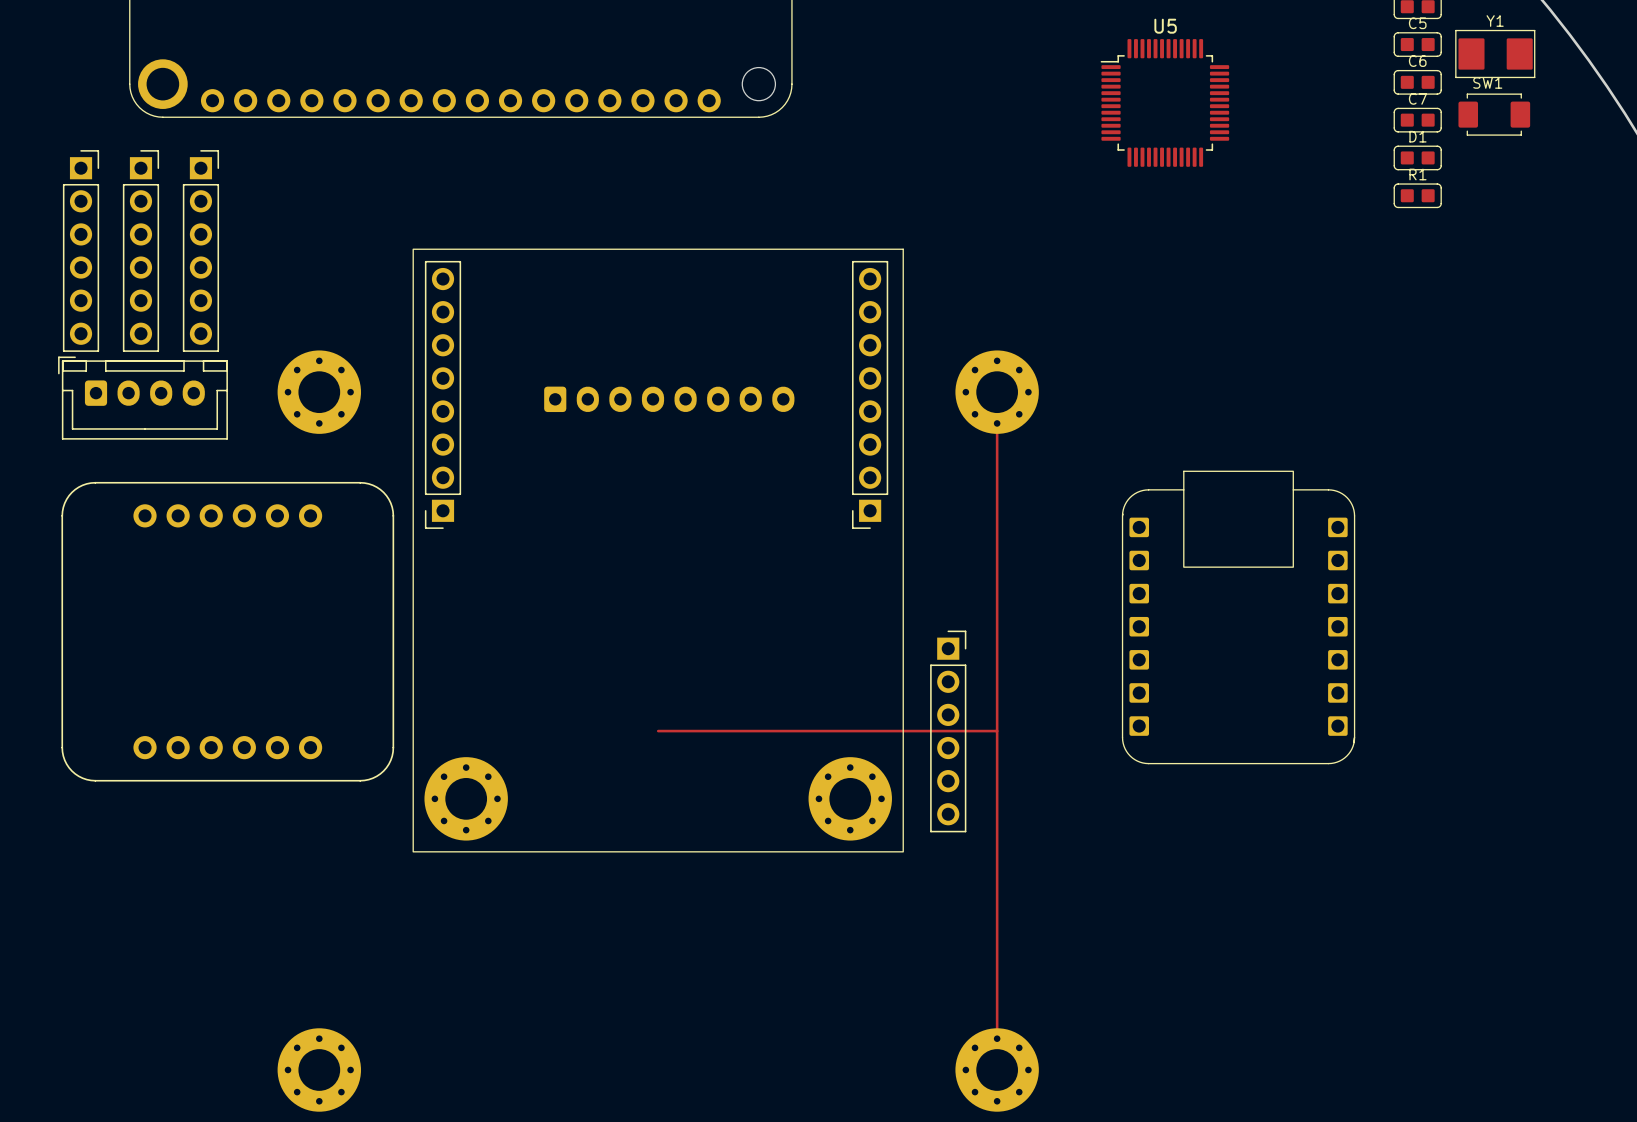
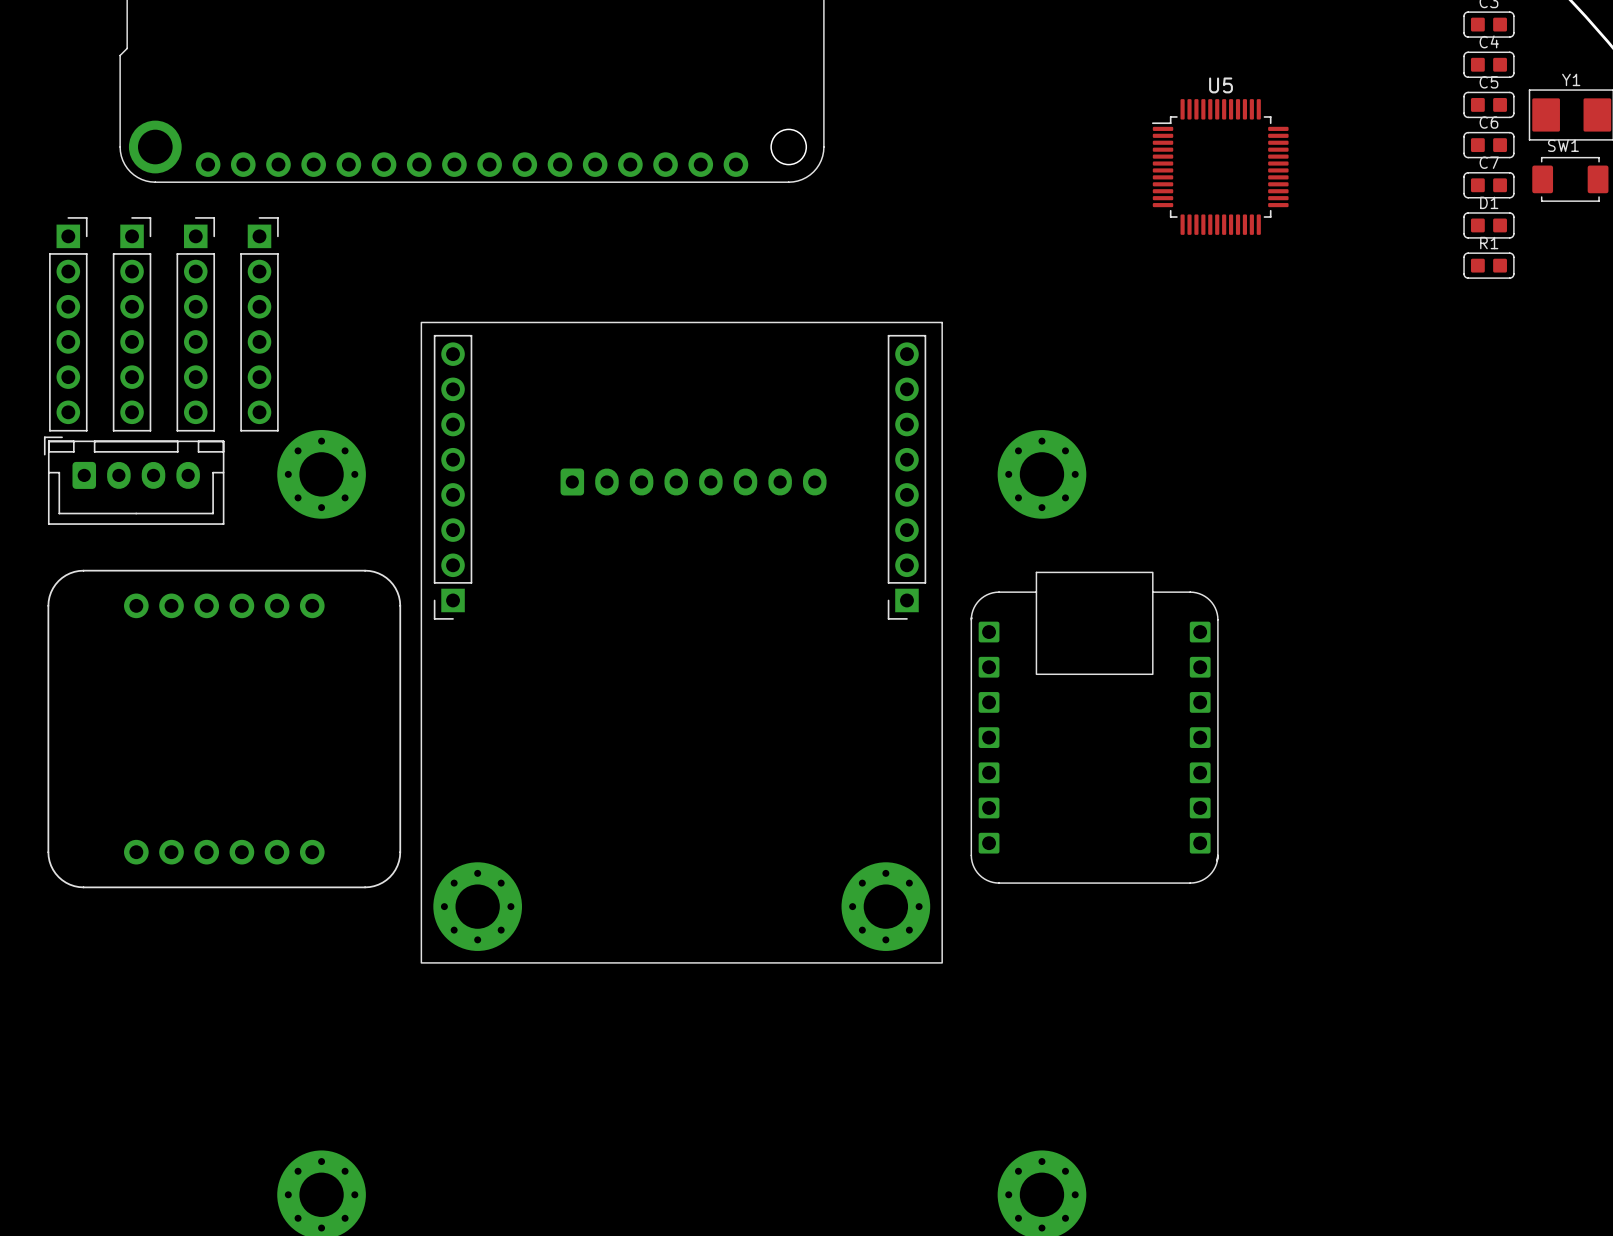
part: none -> (259, 324)
top track: (997, 392) (997, 1069) -> none
part position: (1238, 617) -> (1094, 727)
top track: (658, 731) (997, 731) -> none
part: (948, 731) -> none

